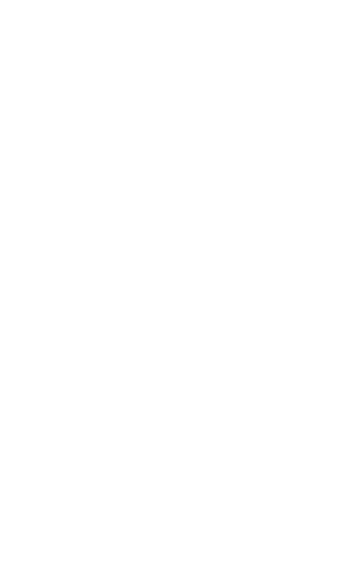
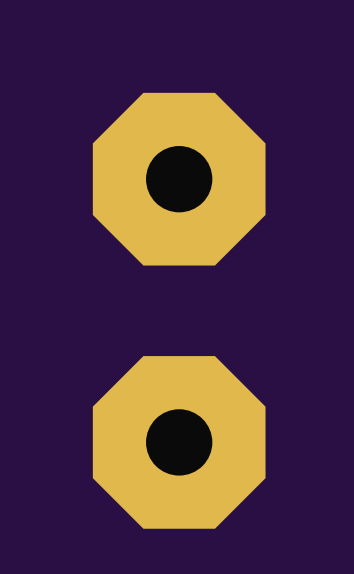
part: none -> (179, 179)
part: none -> (179, 442)

